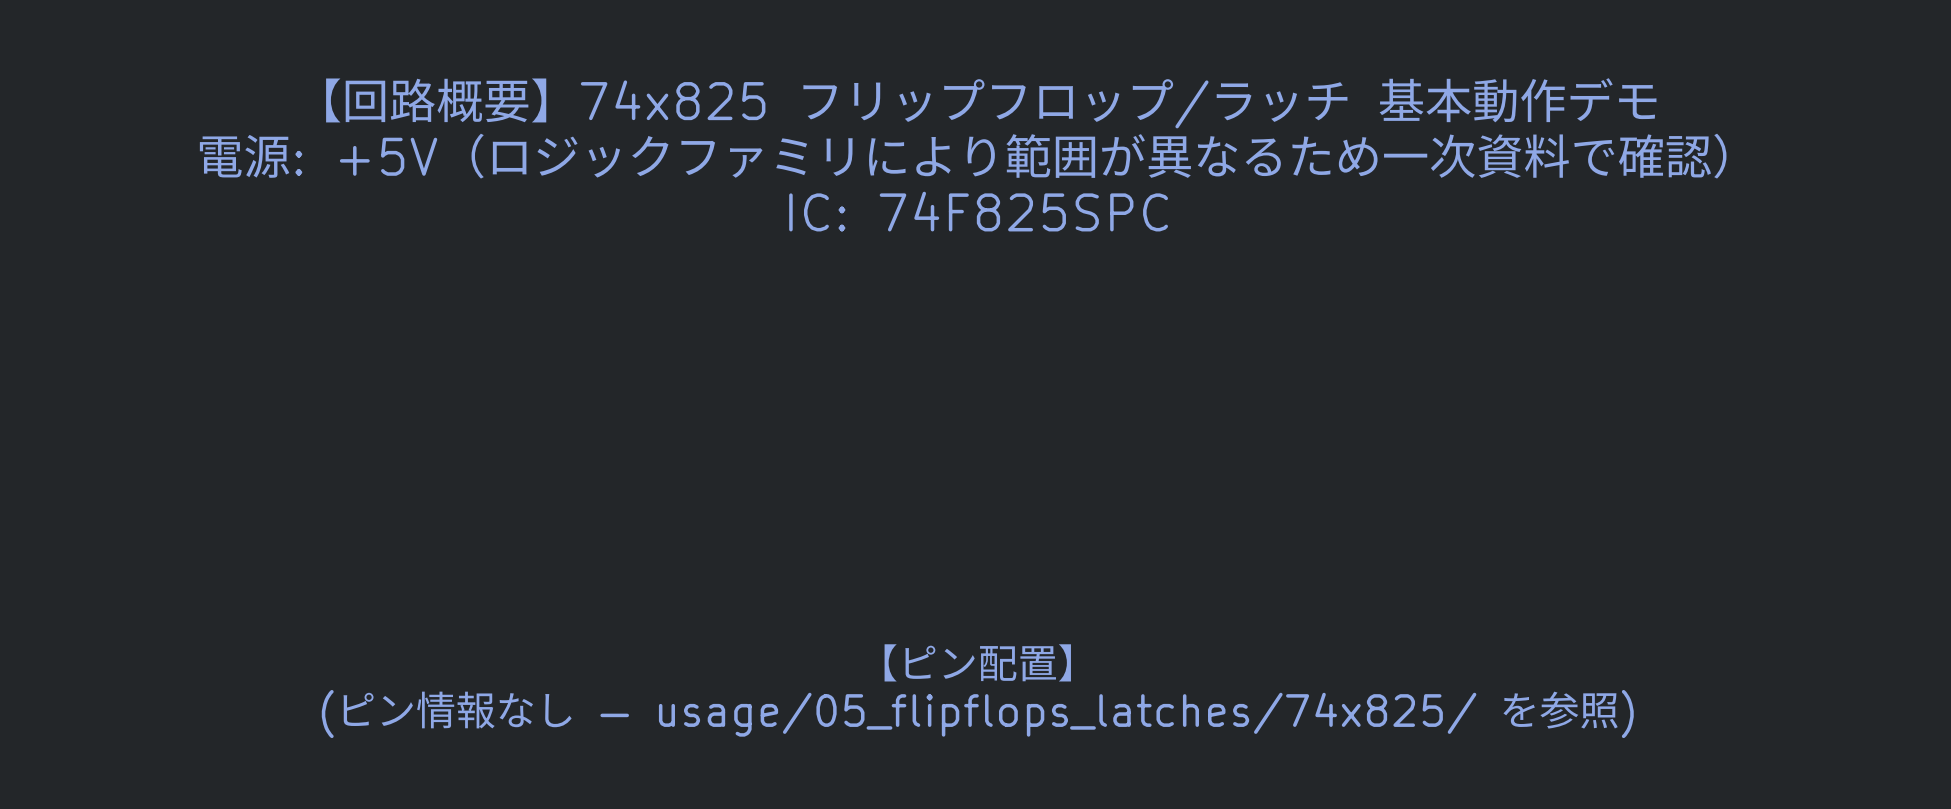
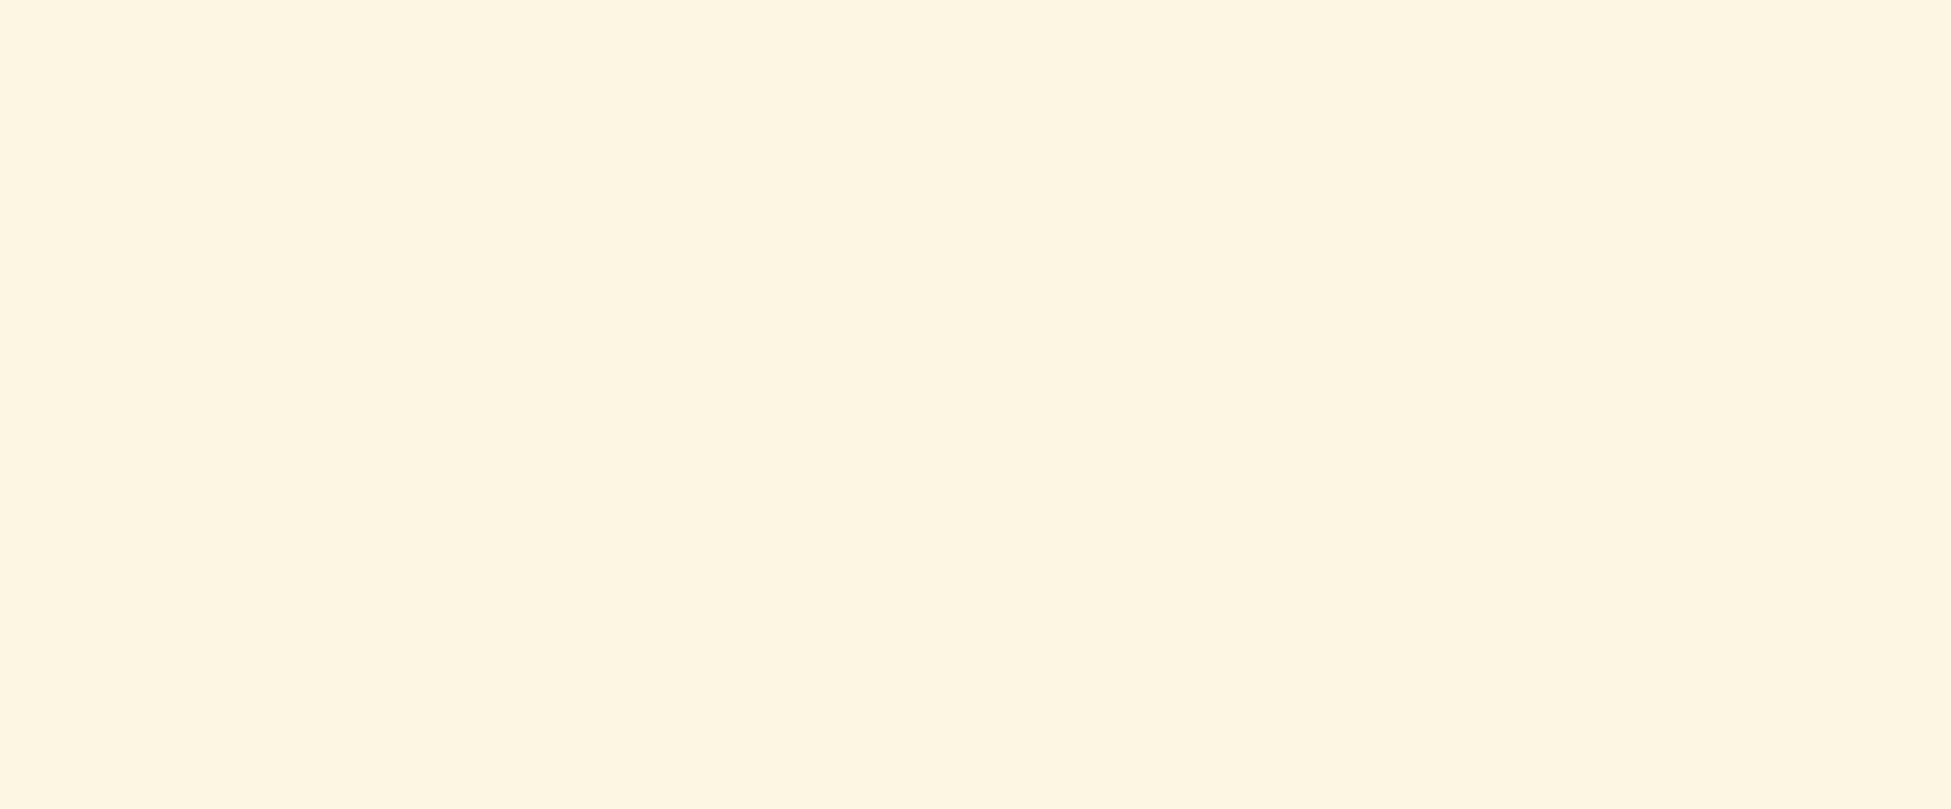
text: 【回路概要】74x825 フリップフロップ/ラッチ 基本動作デモ (991, 102) -> none
text: 電源: +5V（ロジックファミリにより範囲が異なるため一次資料で確認） (963, 156) -> none
text: IC: 74F825SPC (978, 211) -> none
text: 【ピン配置】 (977, 662) -> none
text: (ピン情報なし — usage/05_flipflops_latches/74x825/ を参照) (977, 713) -> none

